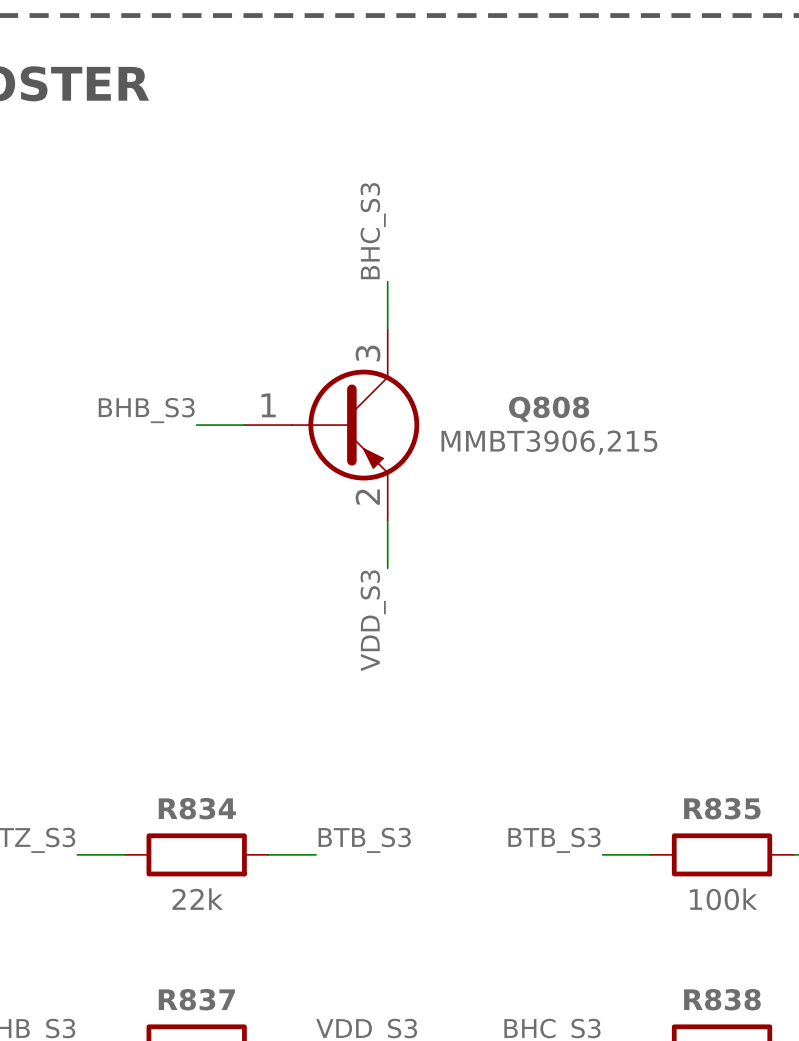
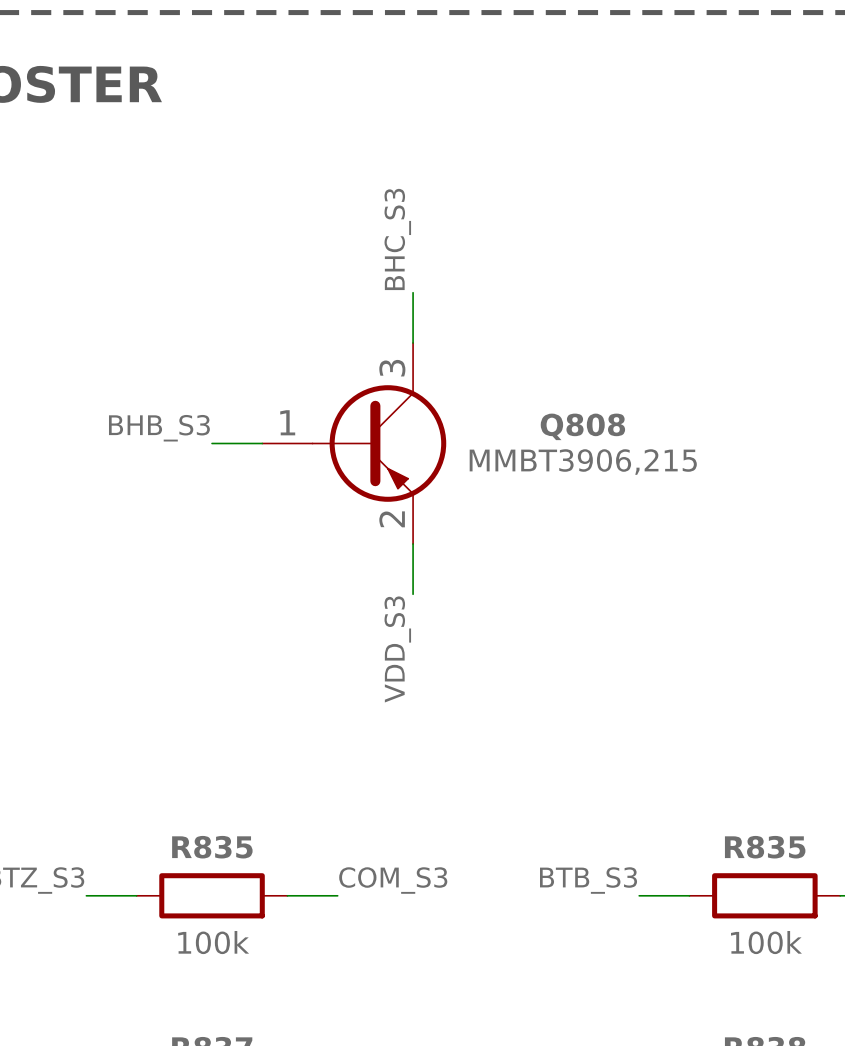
R834 name: R834 (197, 808) -> R835 (212, 847)
label: BTB_S3 (364, 840) -> COM_S3 (393, 880)
R834 value: 22k (197, 899) -> 100k (213, 942)

